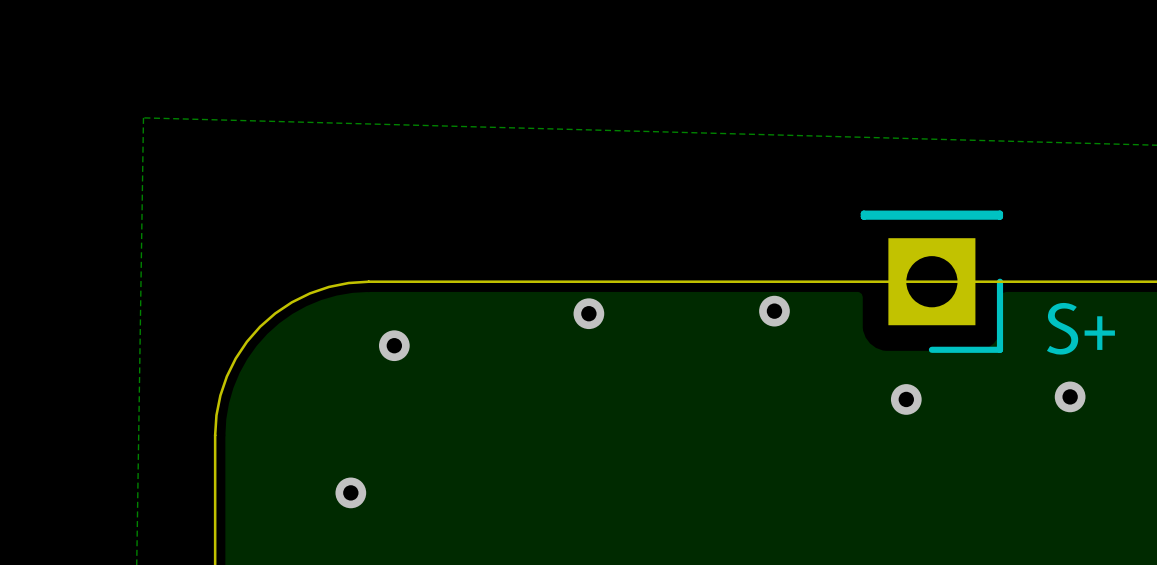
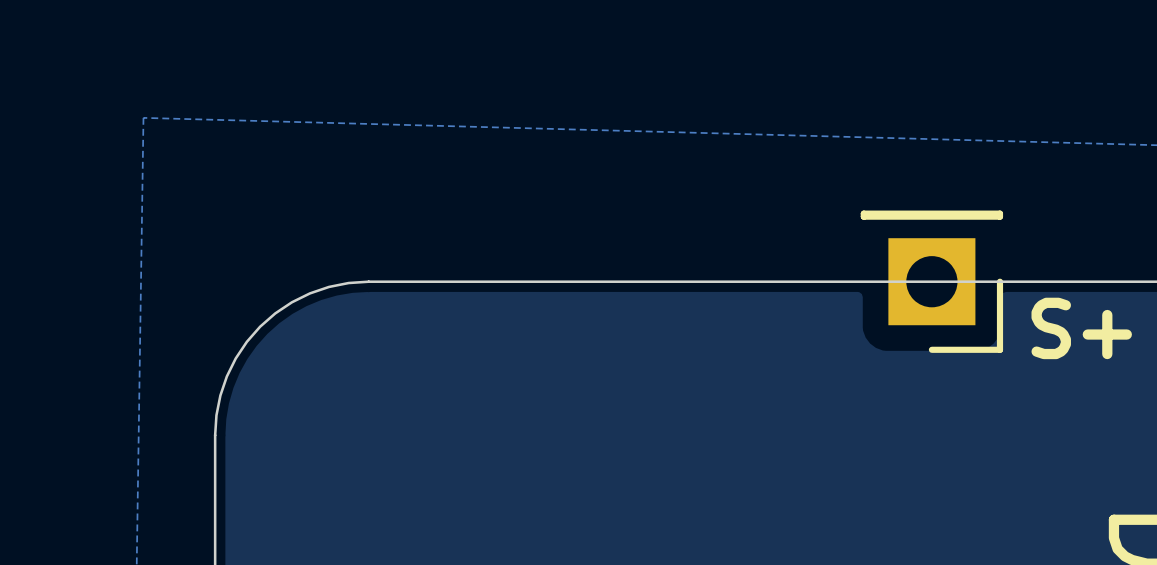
via: (774, 311) -> none
via: (588, 313) -> none
via: (394, 345) -> none
via: (1070, 396) -> none
via: (906, 399) -> none
via: (350, 492) -> none

